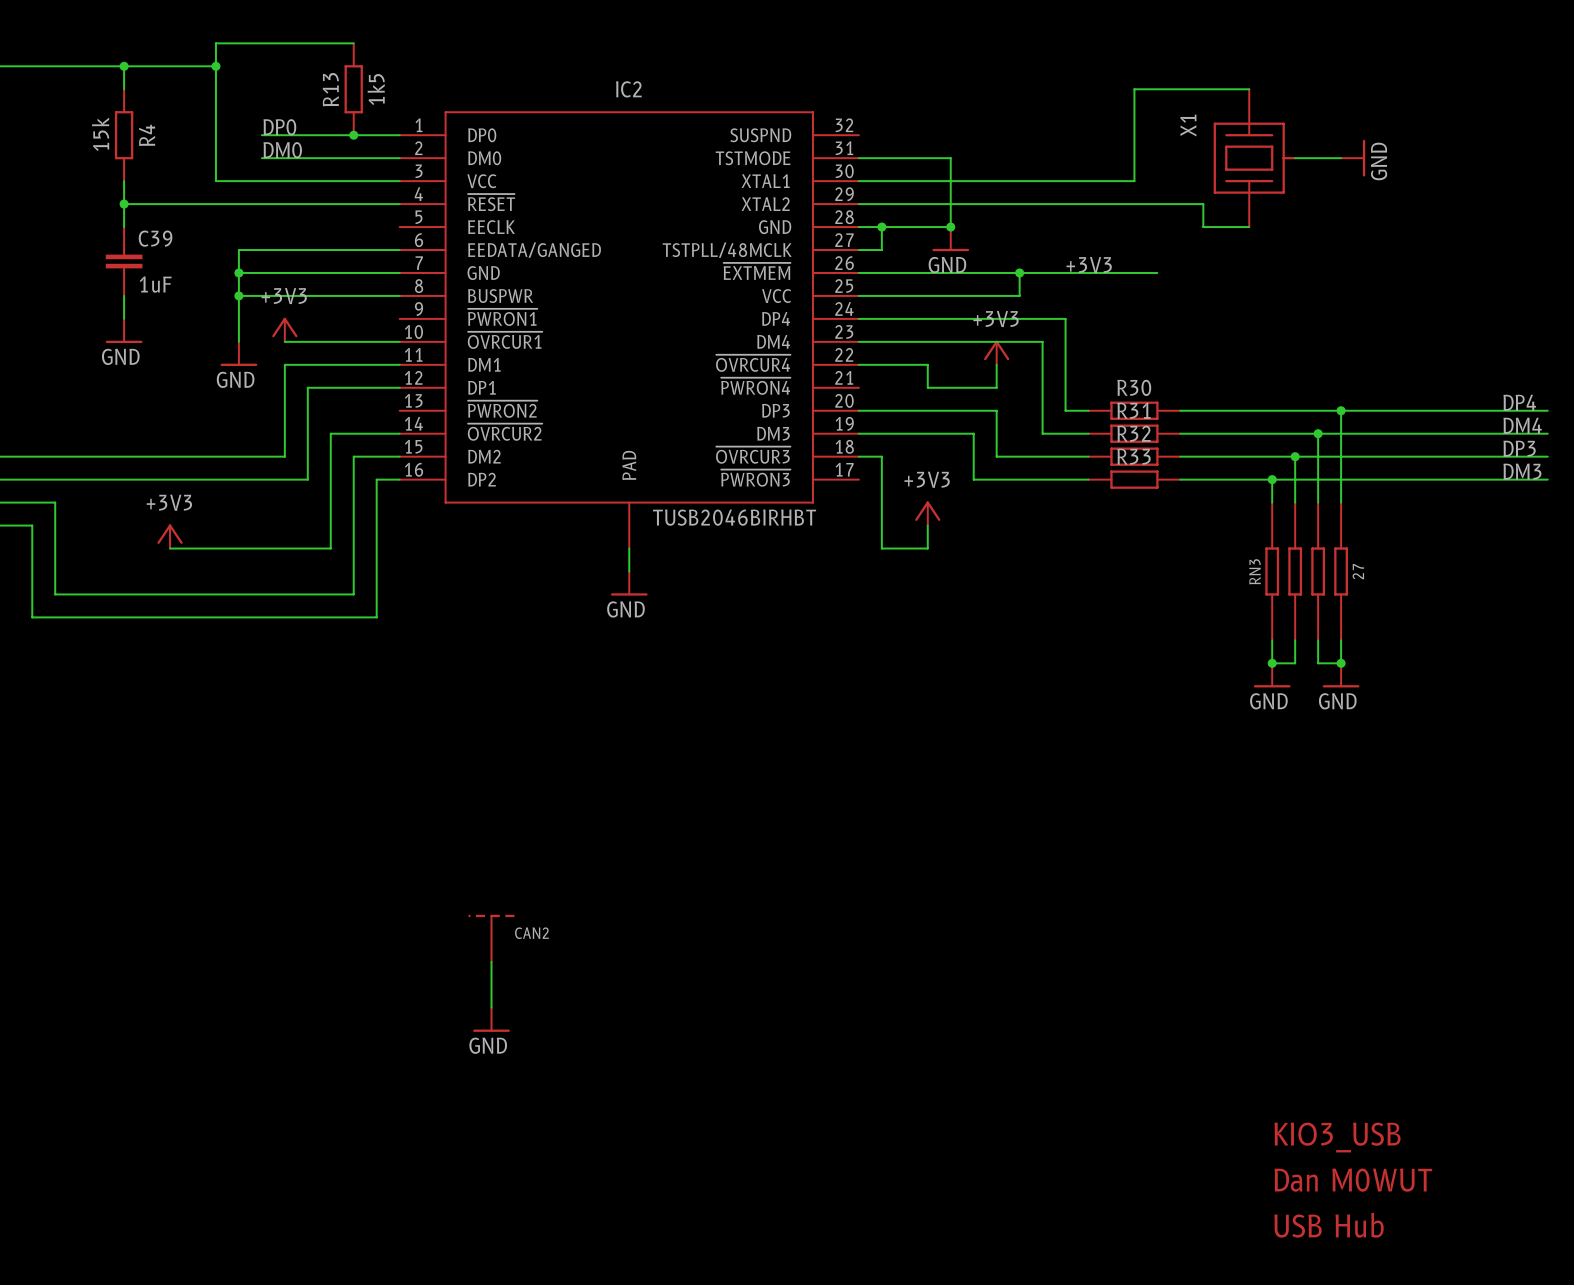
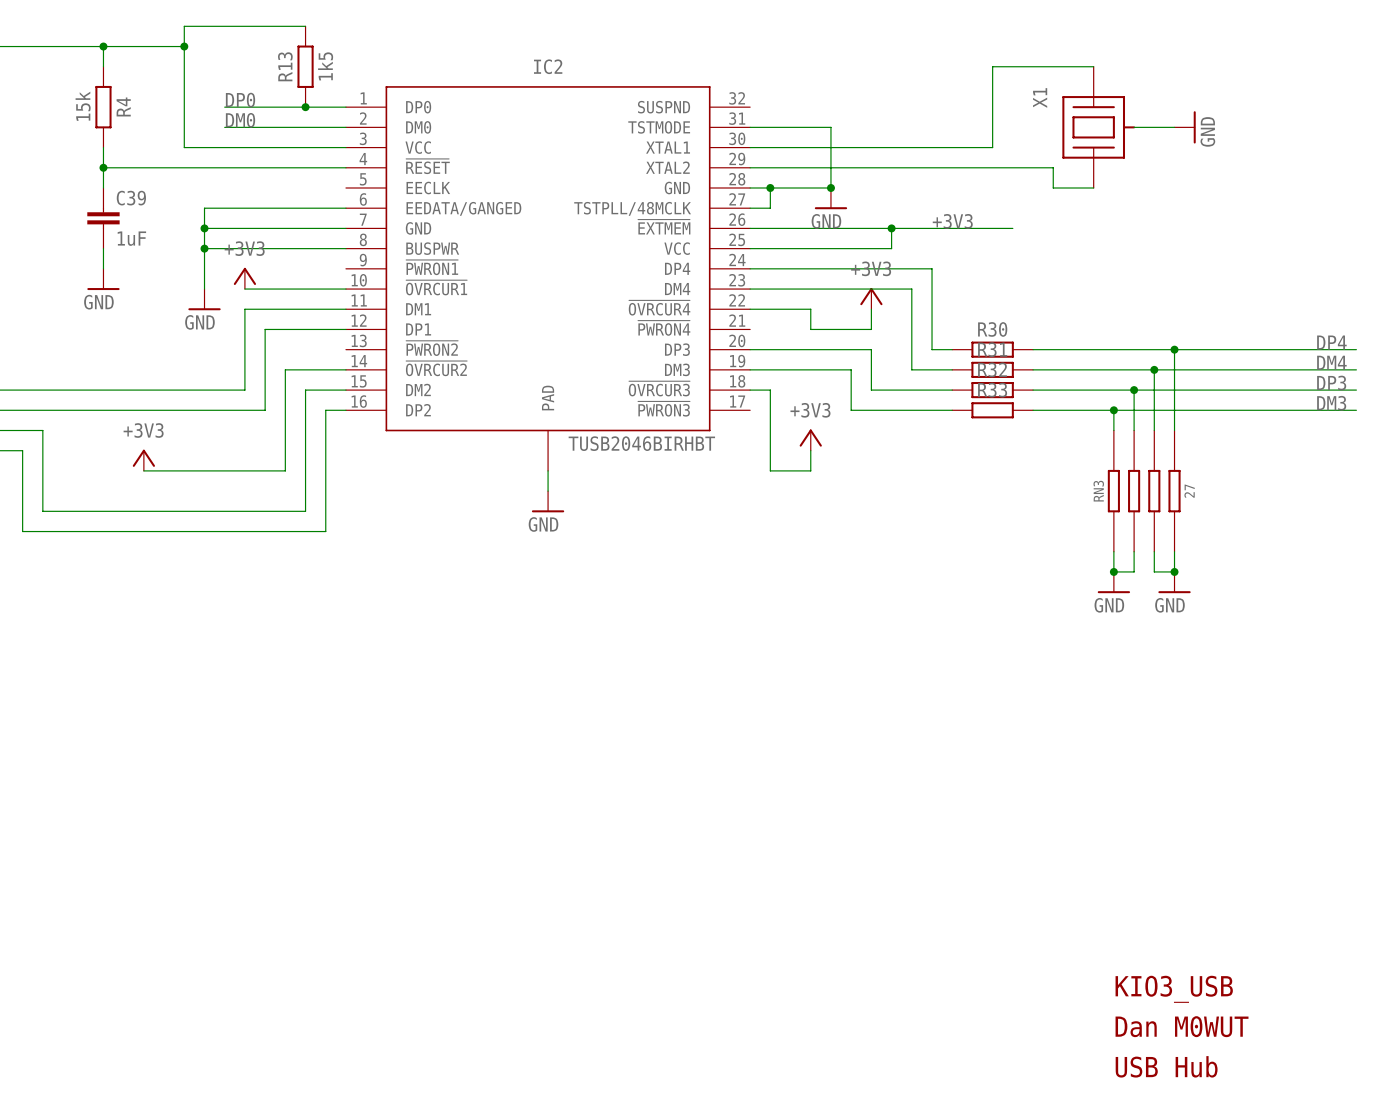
CAN2: (491, 938) -> none
wire: (491, 961) (491, 1007) -> none
power symbol: GND (491, 1019) -> none

